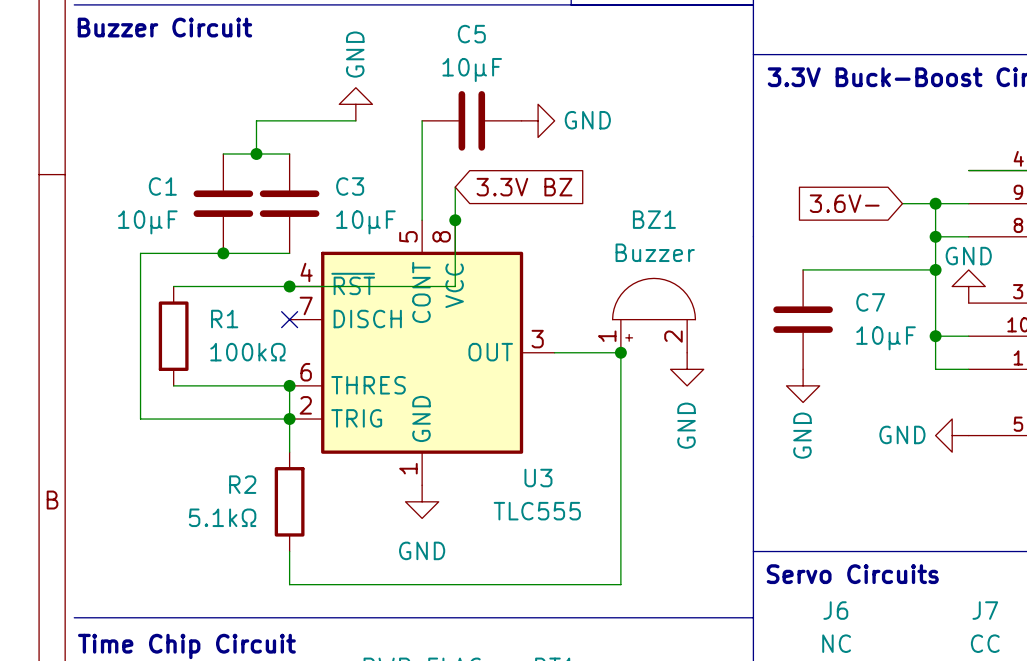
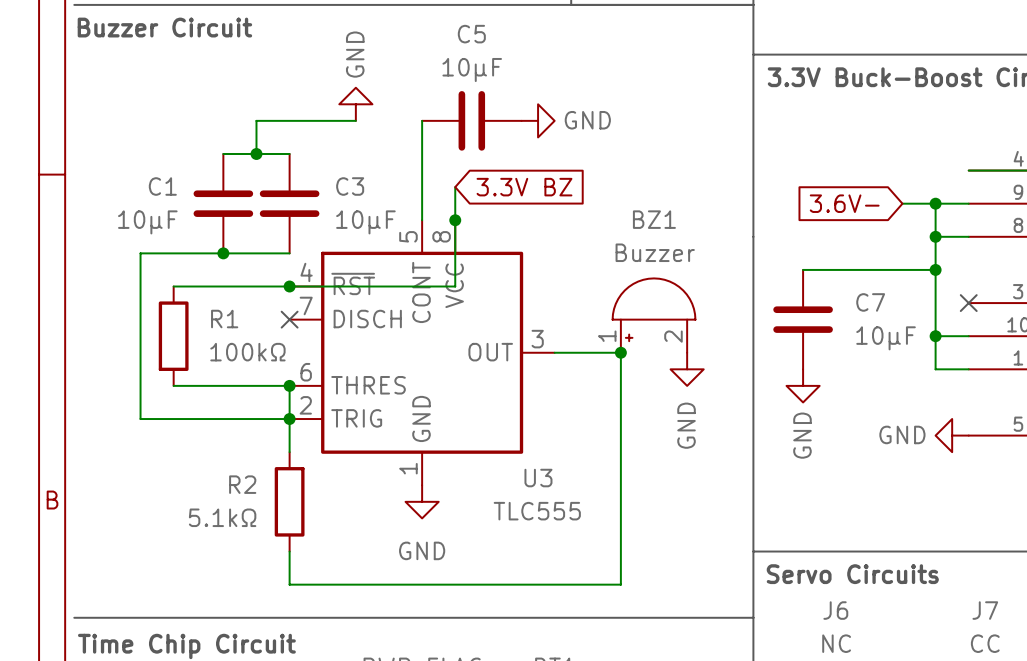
power symbol: GND (968, 286) -> none
no-connect mark: none -> (968, 303)

